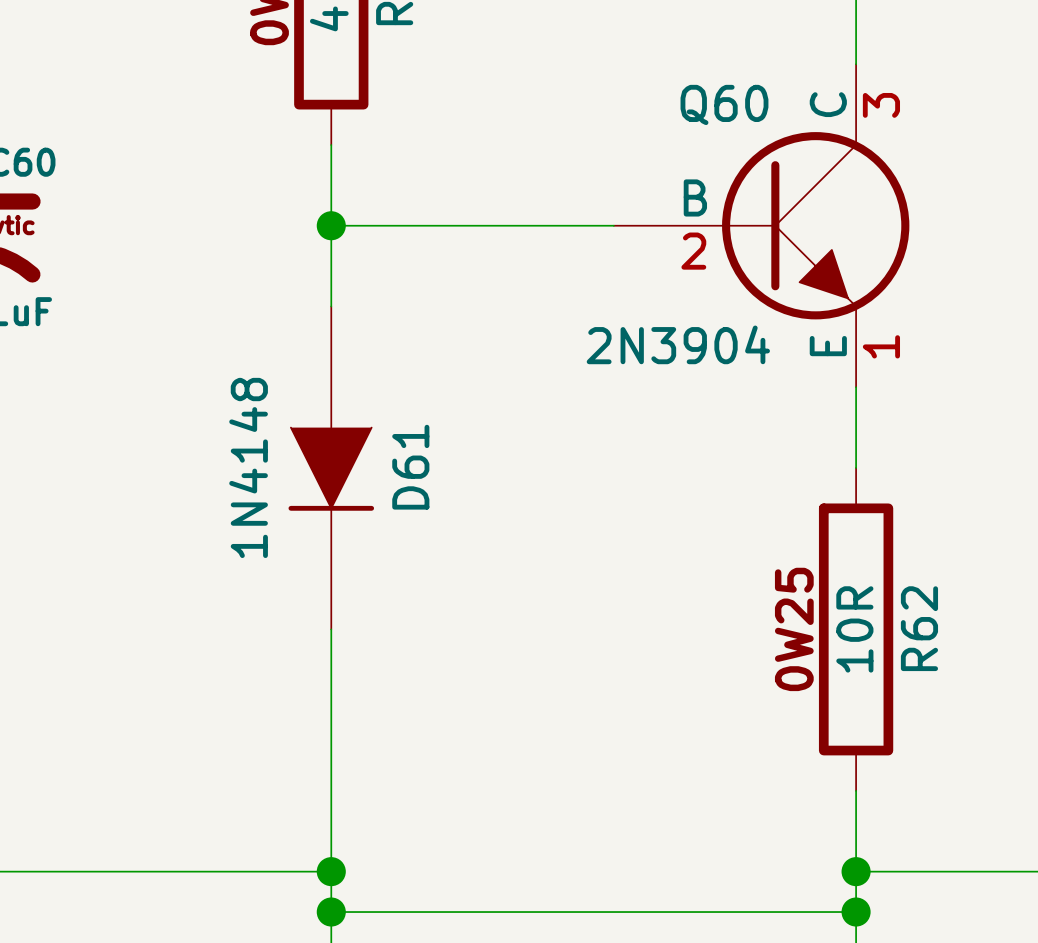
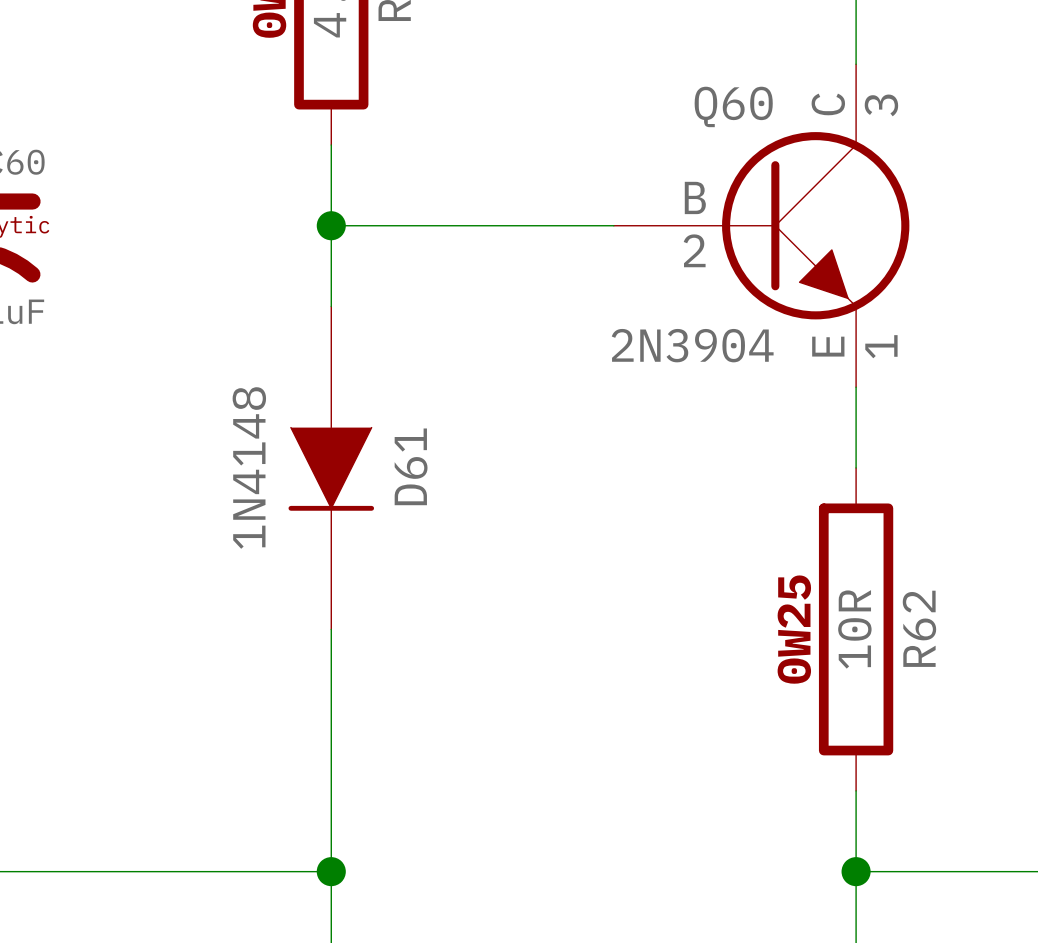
wire: (331, 912) (856, 912) -> none
junction: (331, 912) -> none
junction: (856, 912) -> none

